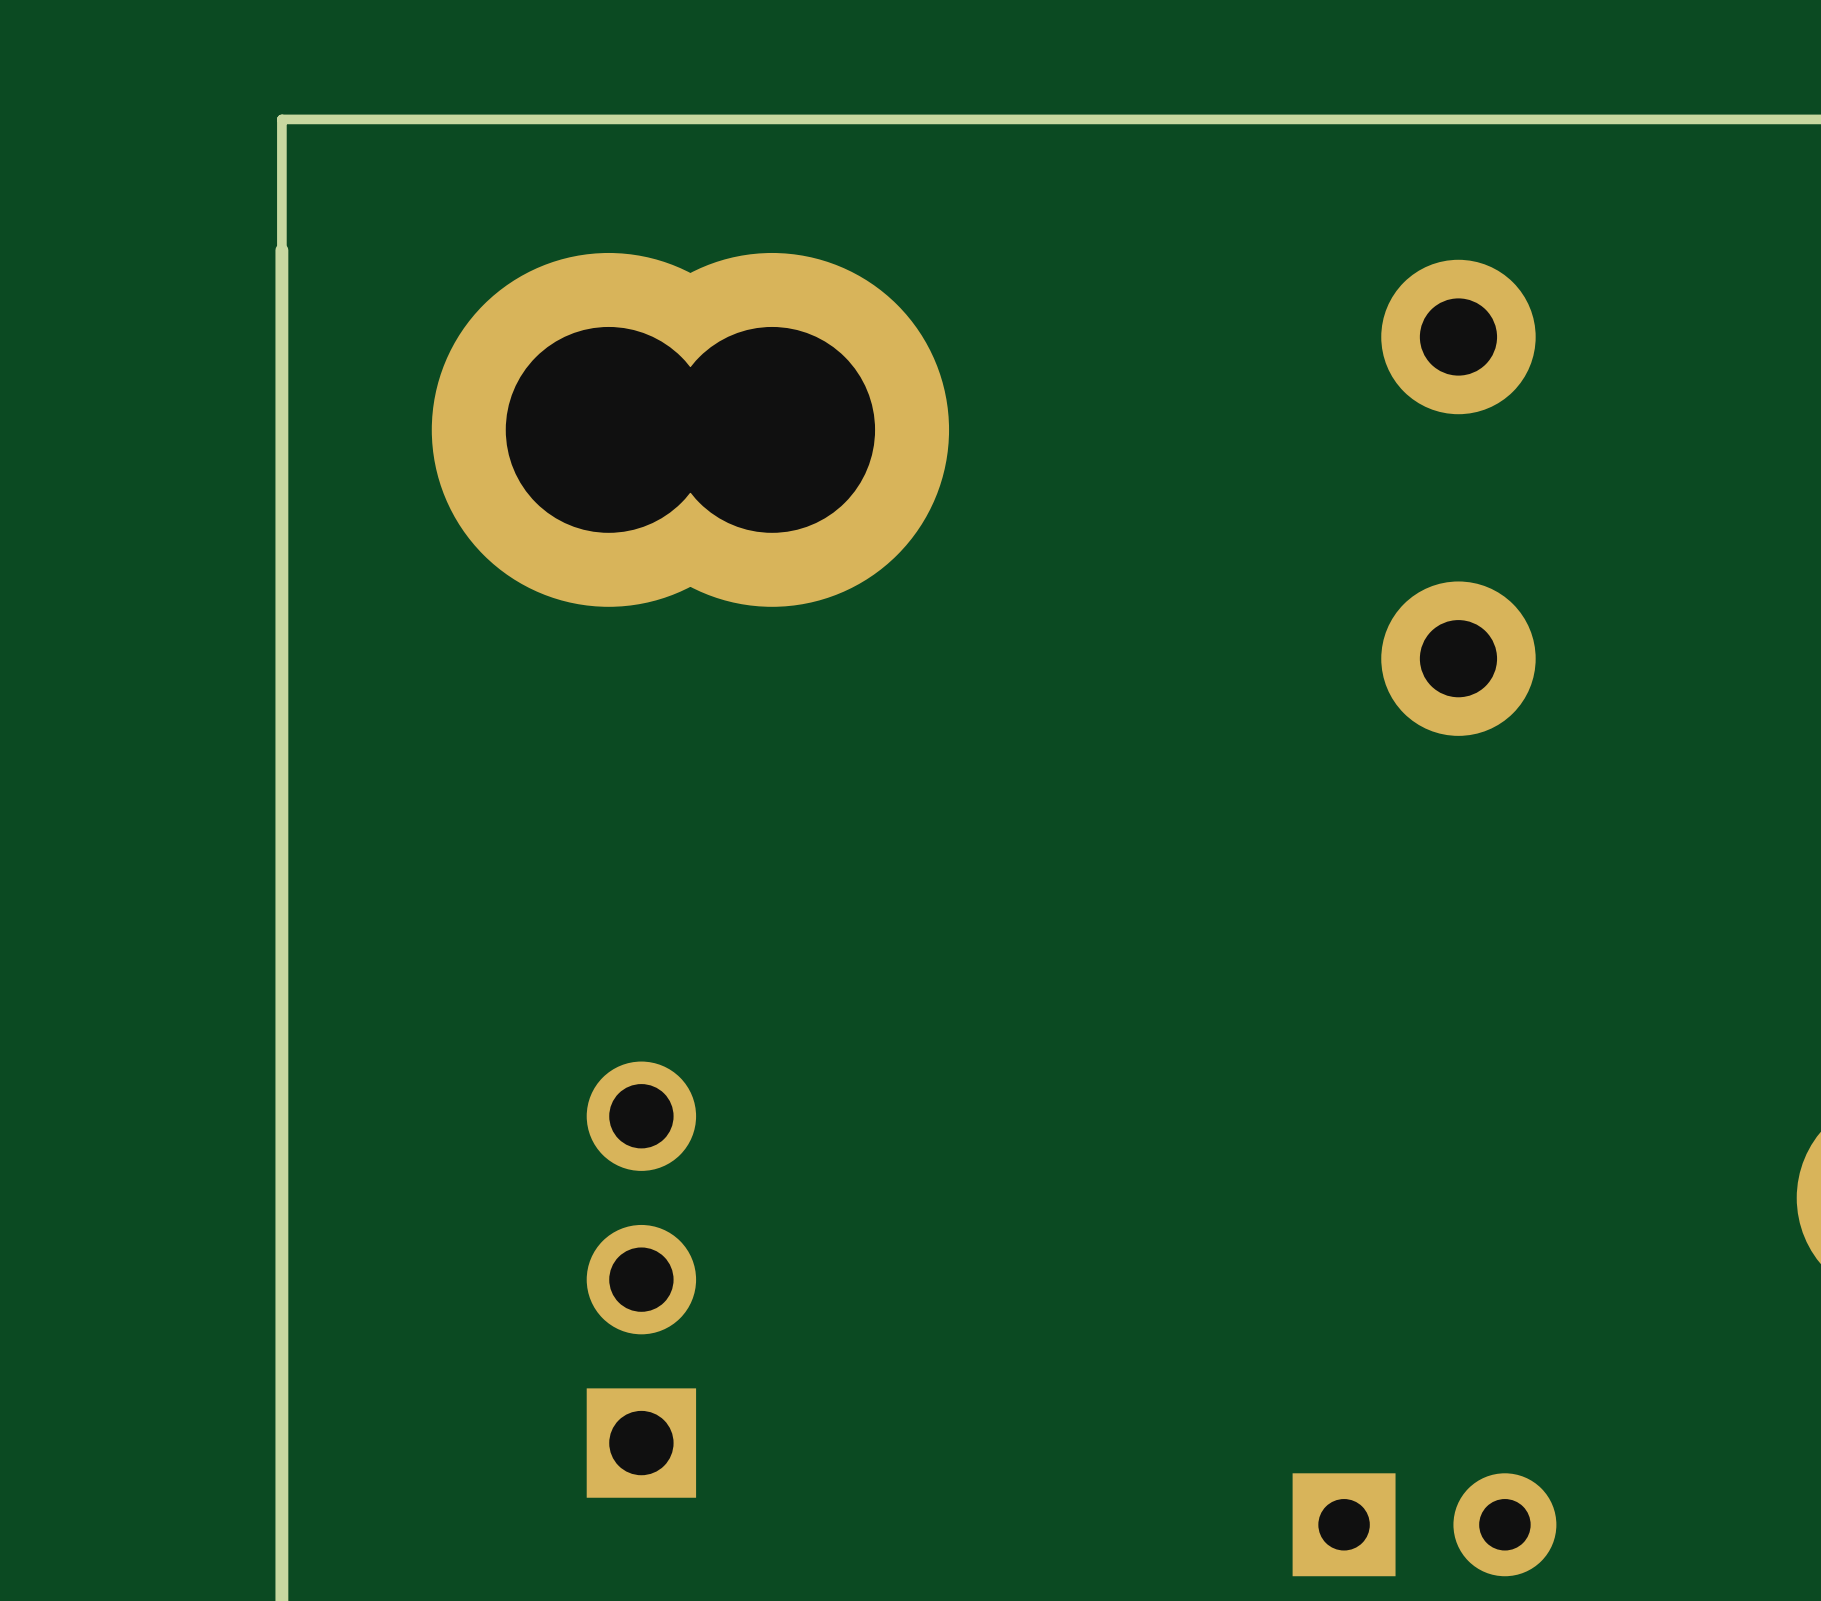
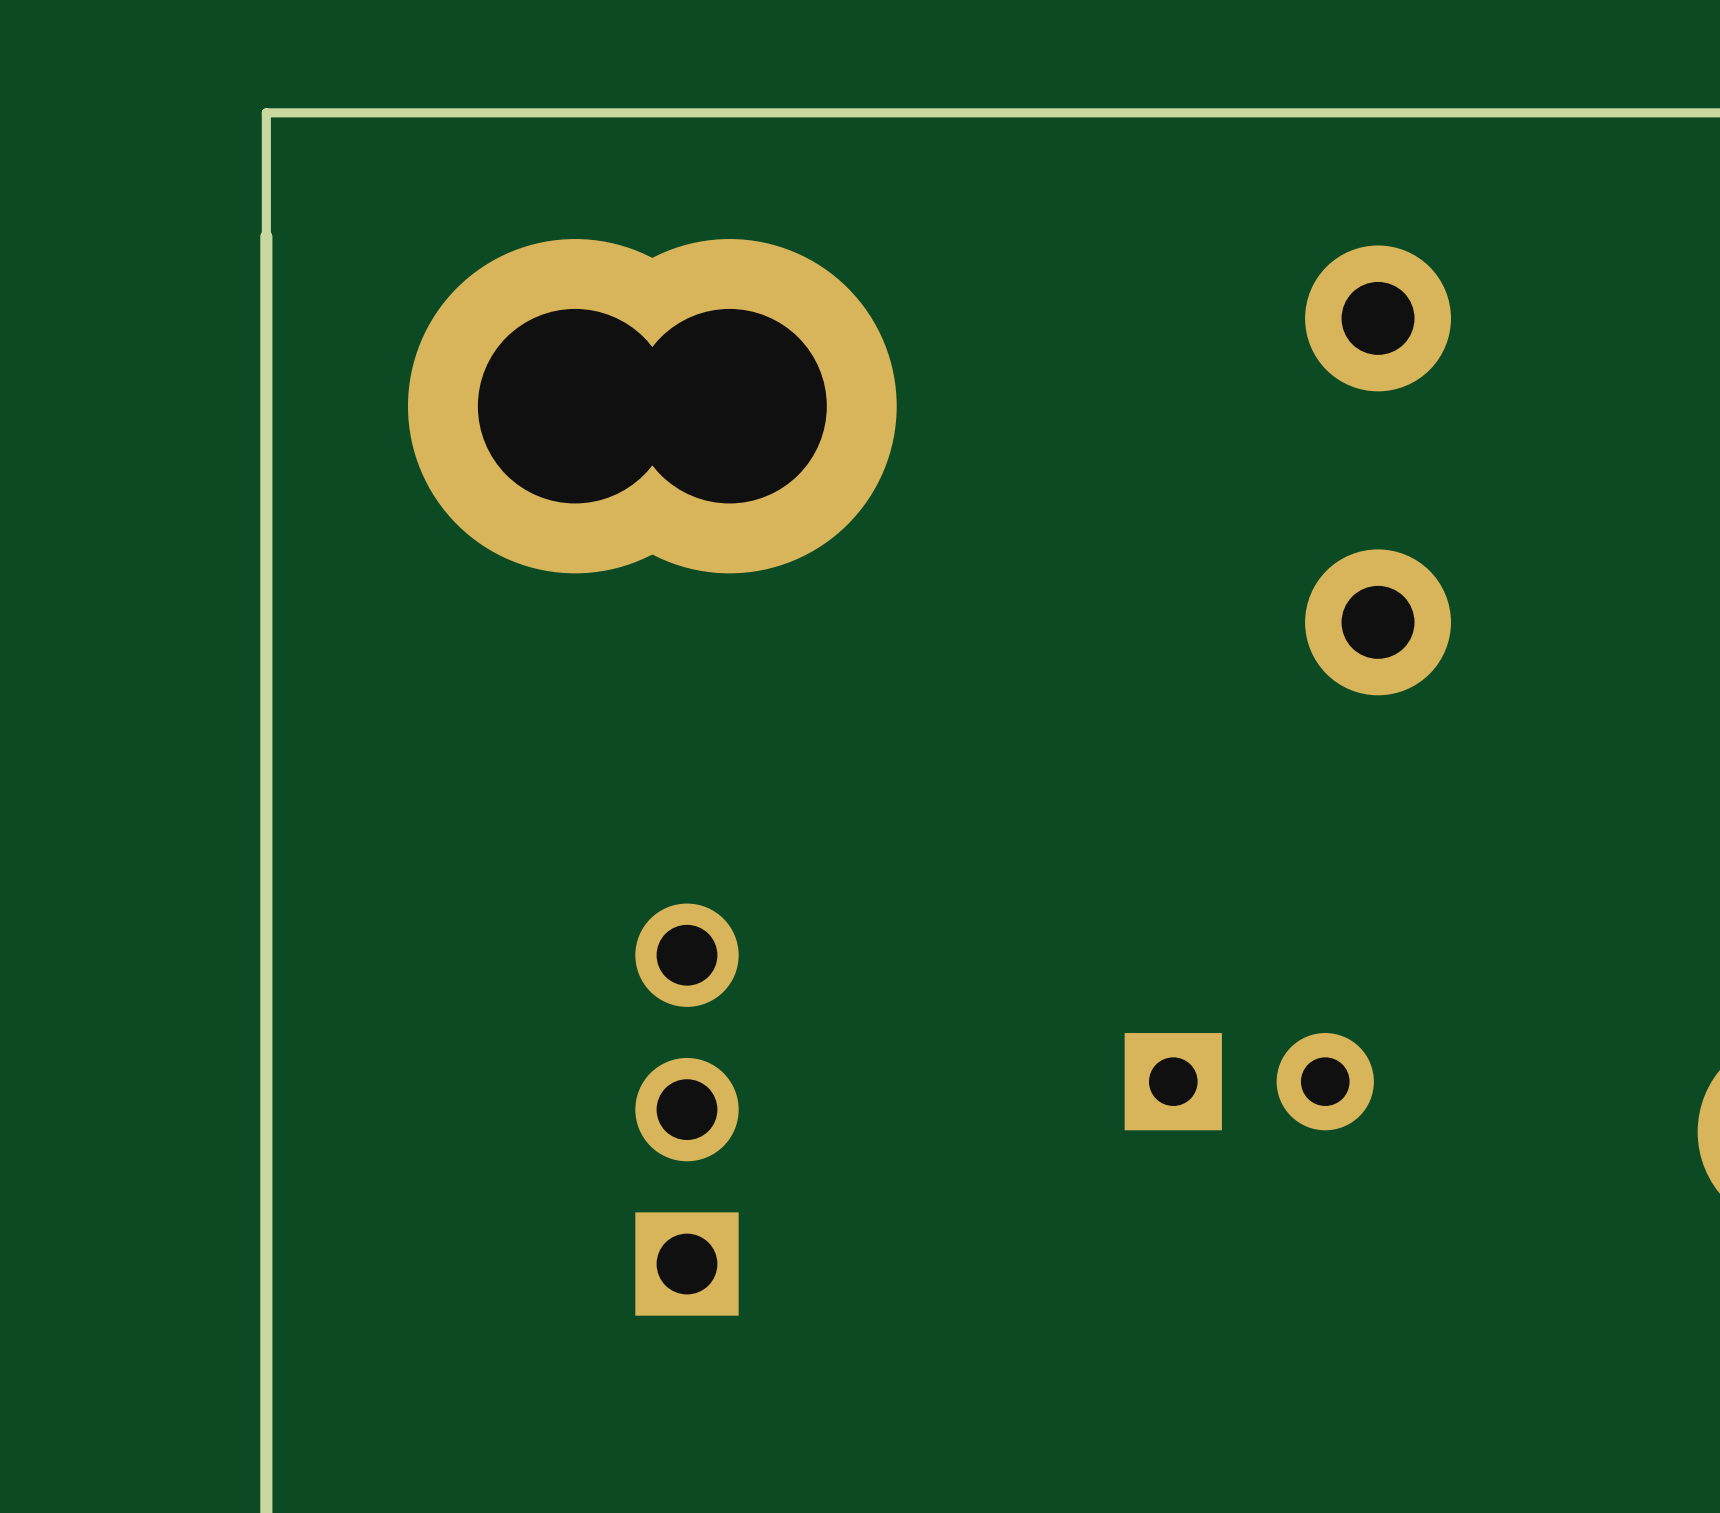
part position: (641, 1279) -> (686, 1109)
part position: (1424, 1524) -> (1249, 1081)

